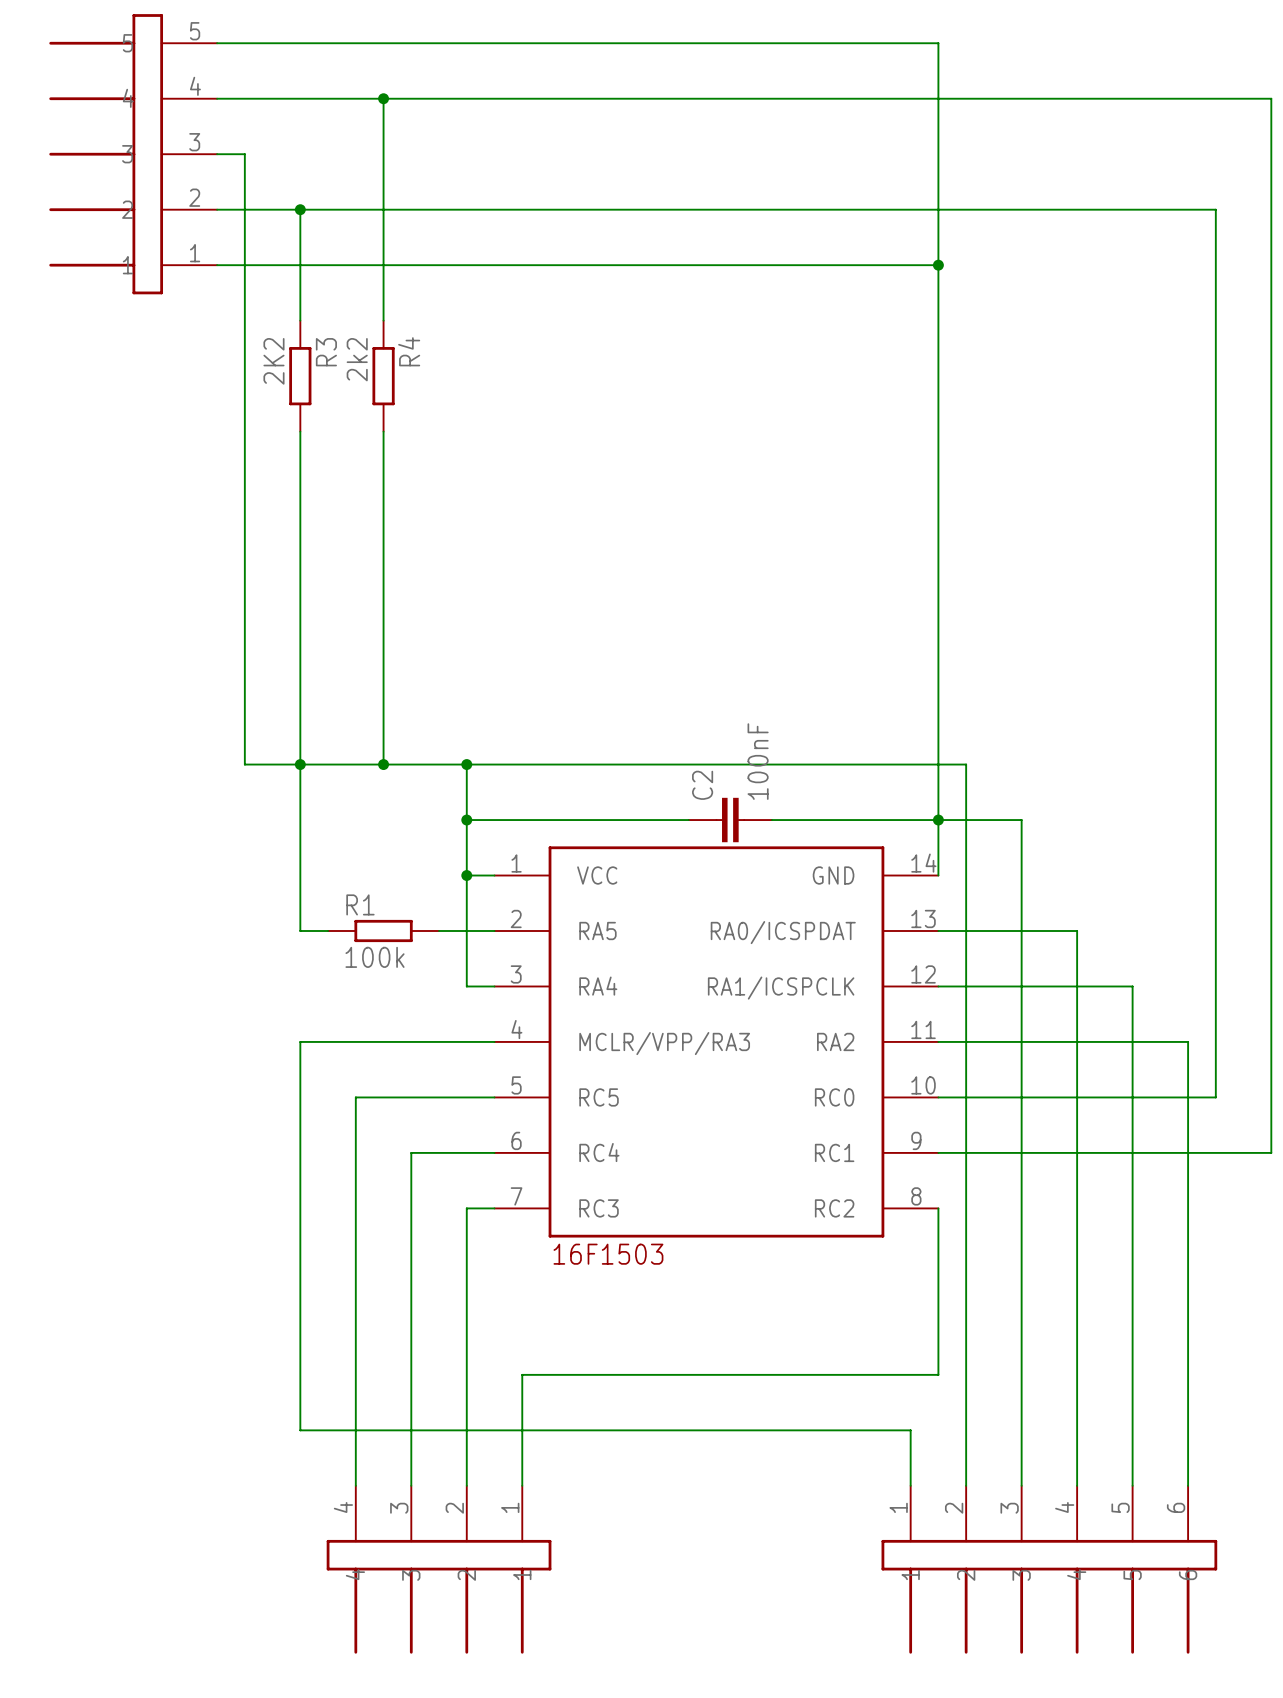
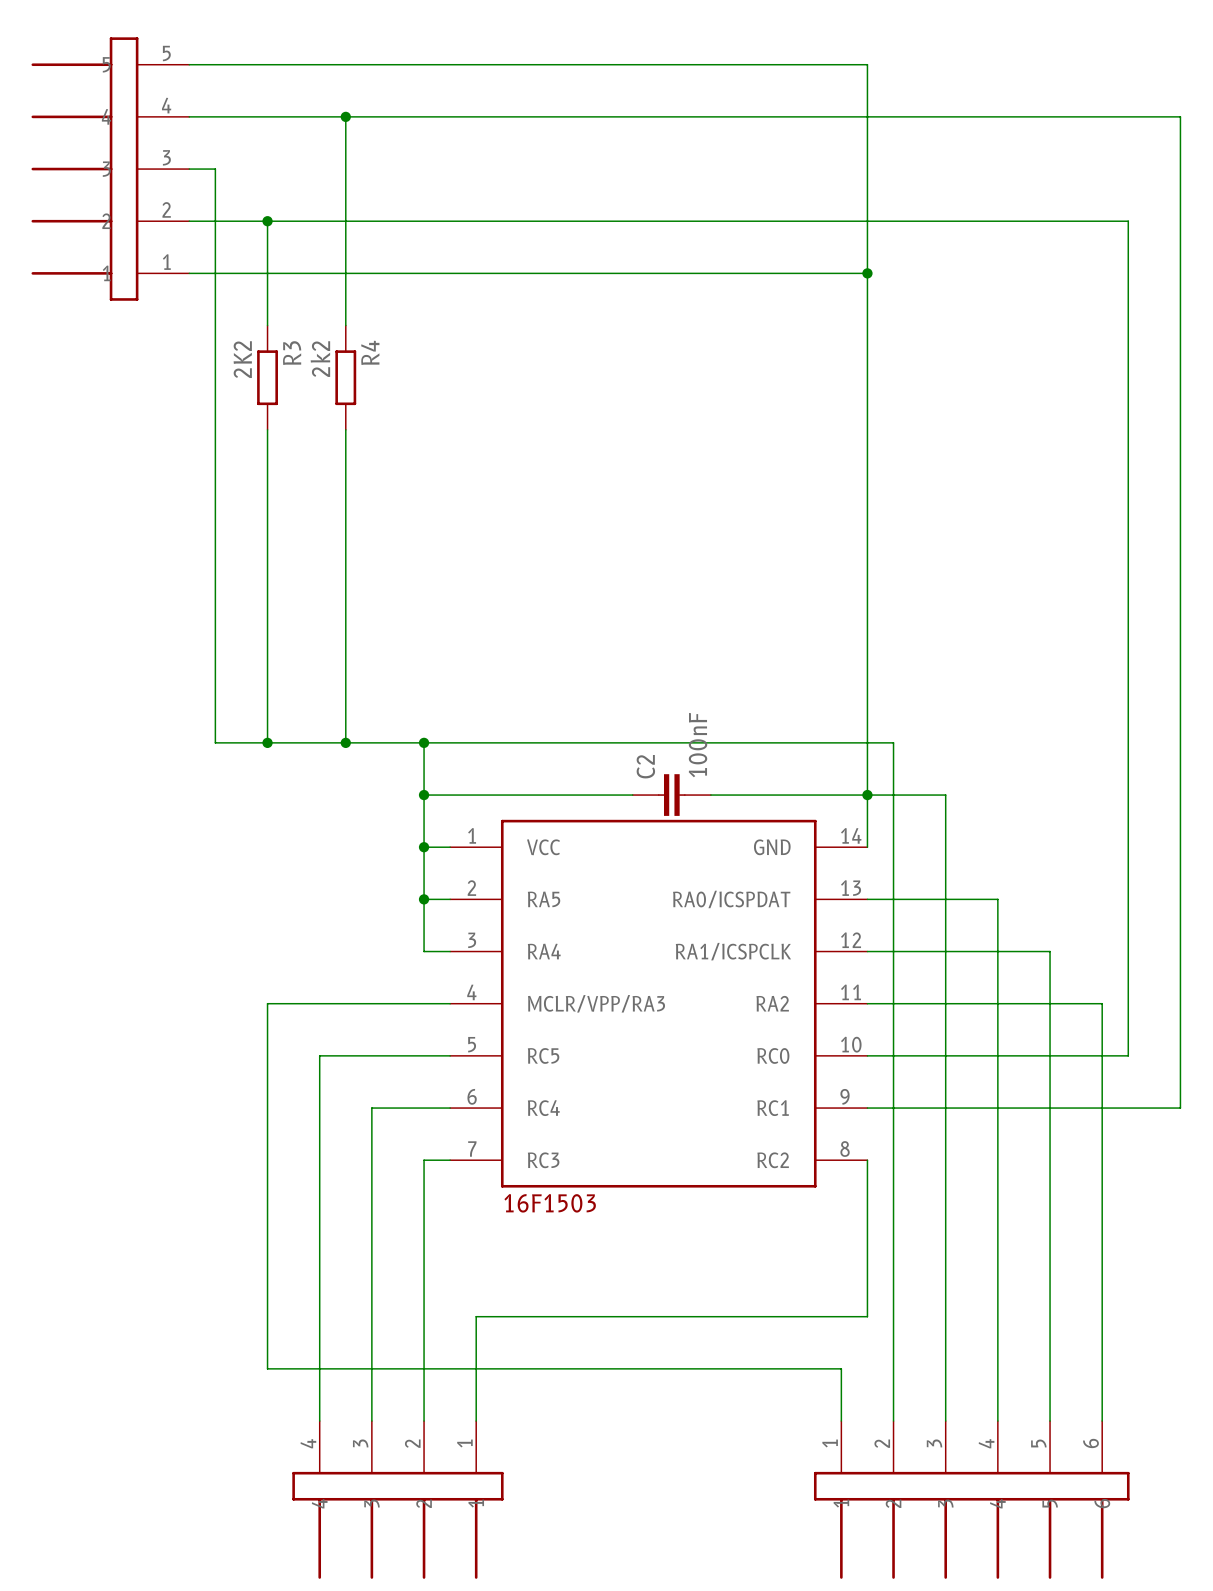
wire: (300, 764) (300, 930) (328, 930) -> none
R1: 100k (383, 930) -> none
wire: (439, 930) (466, 930) -> none
junction: none -> (424, 899)

